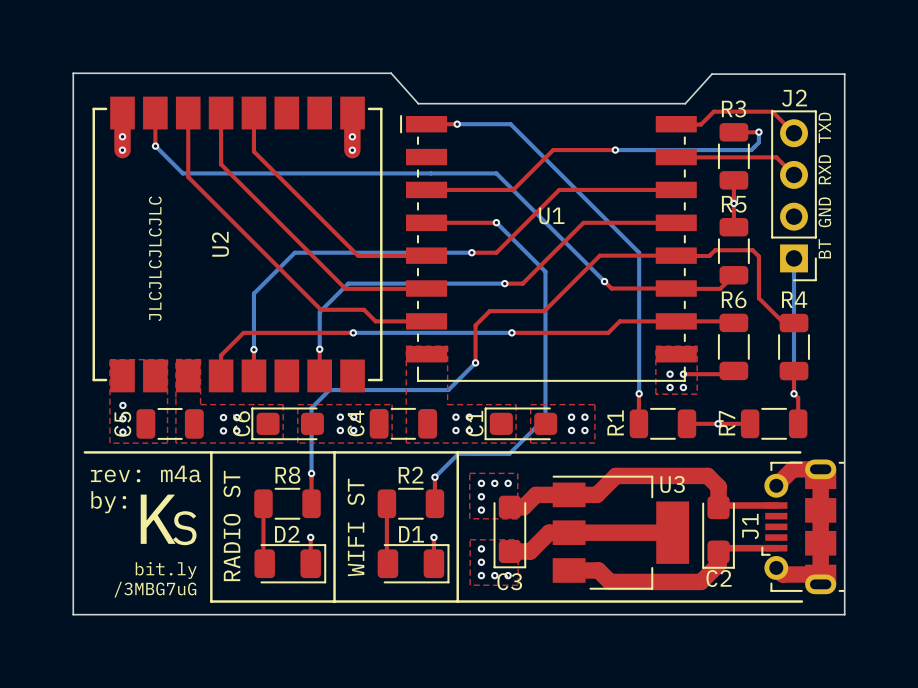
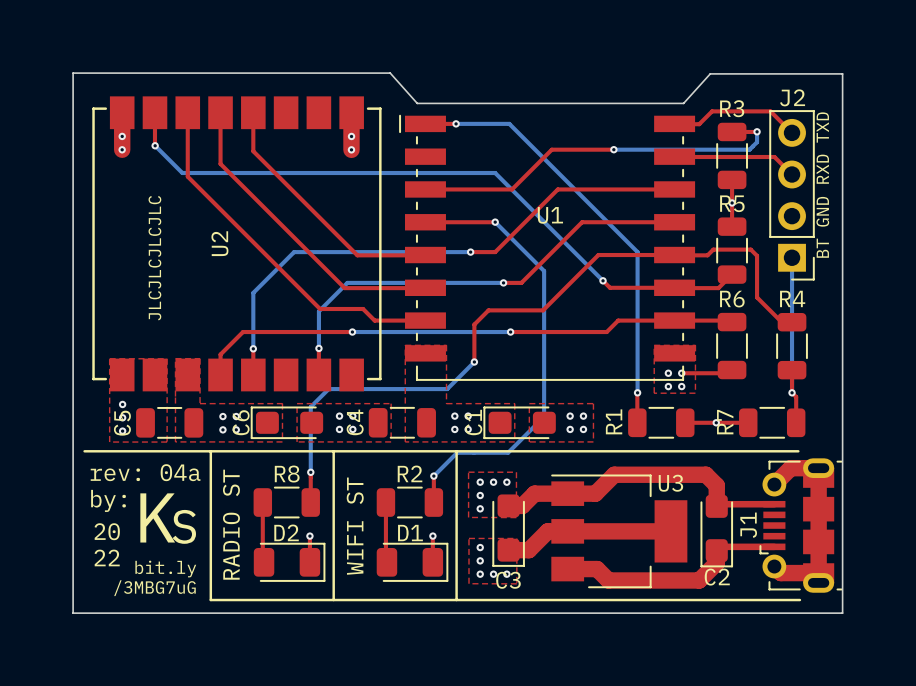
text: rev: m4a (145, 473) -> rev: 04a (145, 472)
text: none -> 20 (107, 531)
text: none -> 22 (107, 557)

